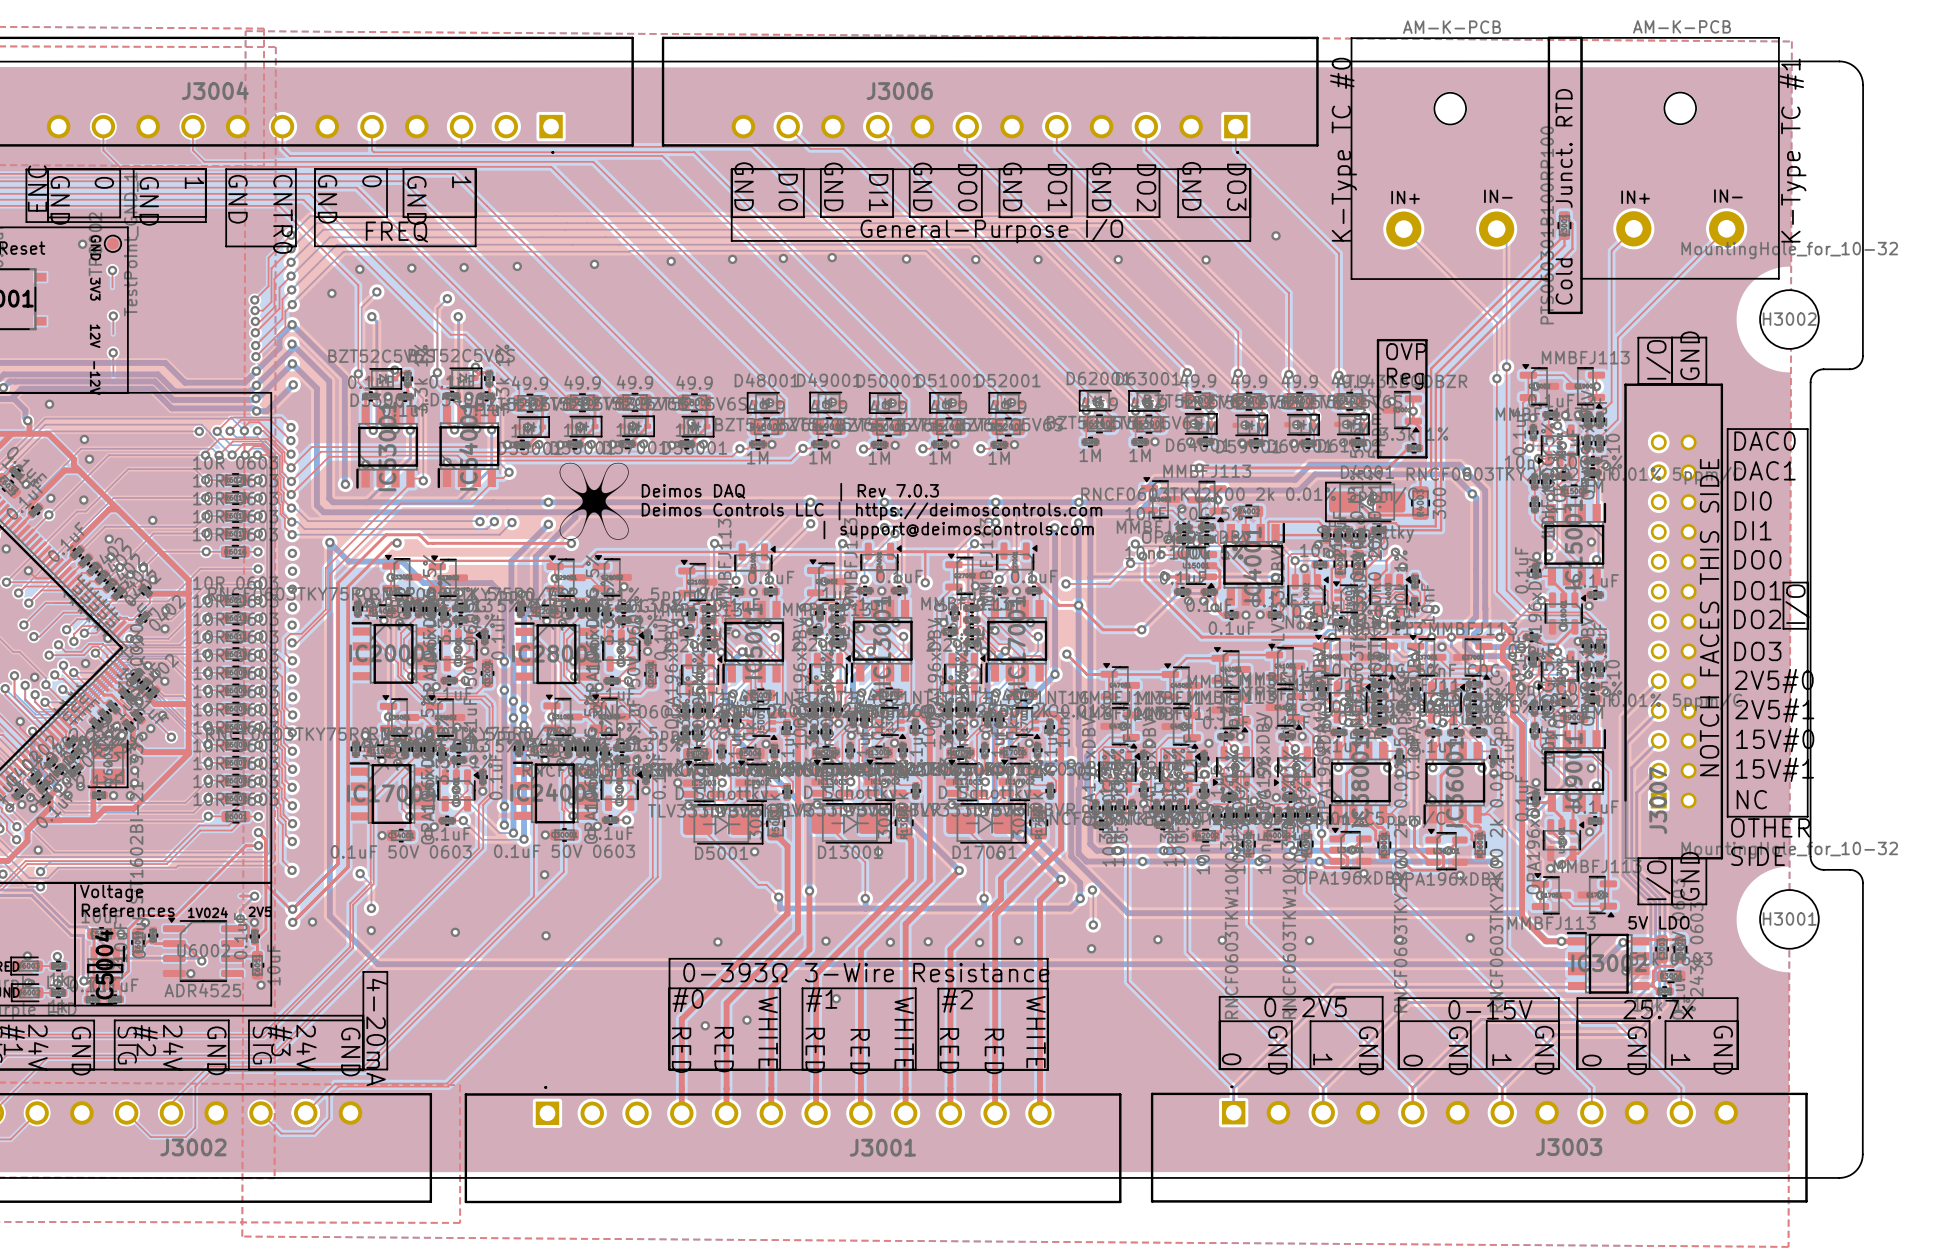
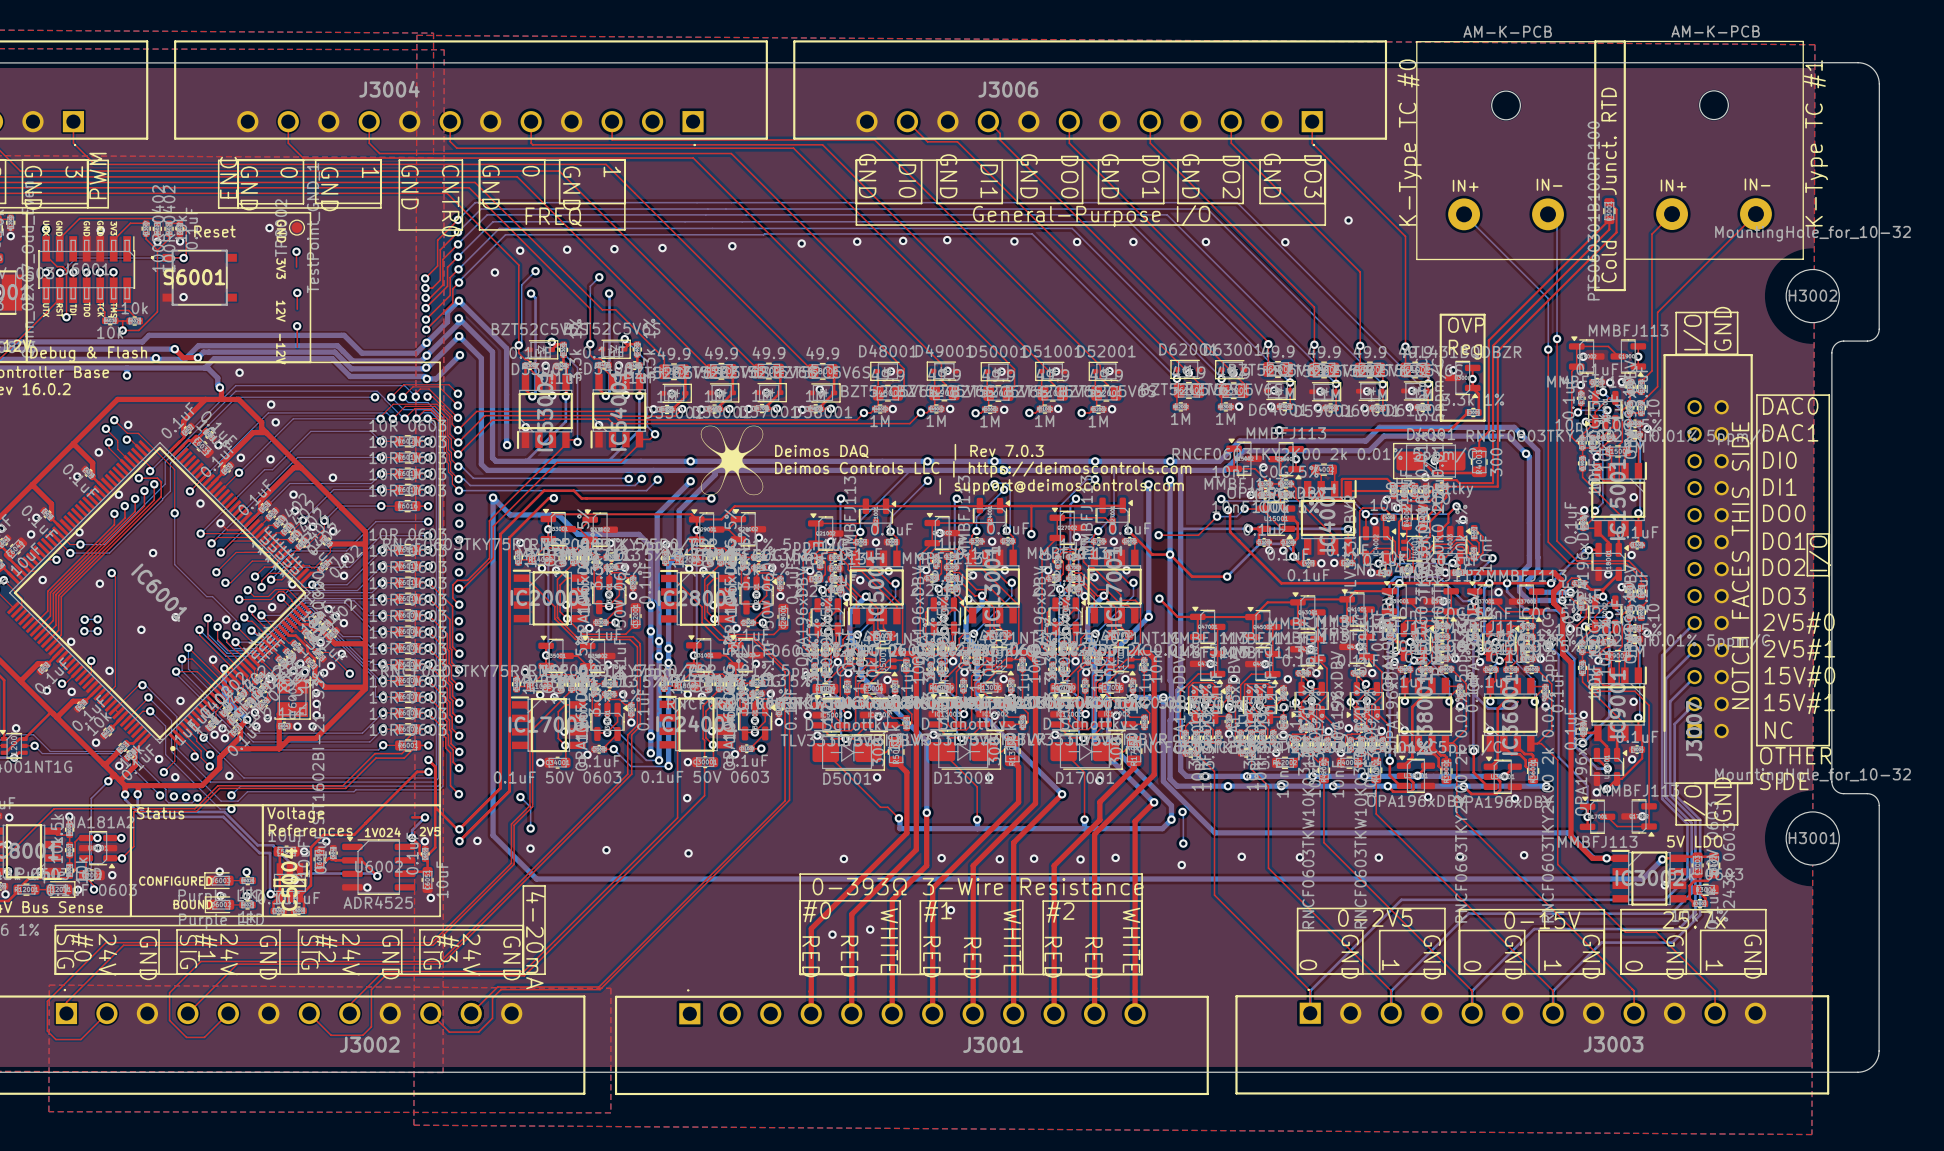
bottom track: none -> (1473, 693) (1488, 708) (1510, 708) (1517, 701)
top track: none -> (1517, 701) (1517, 701)

